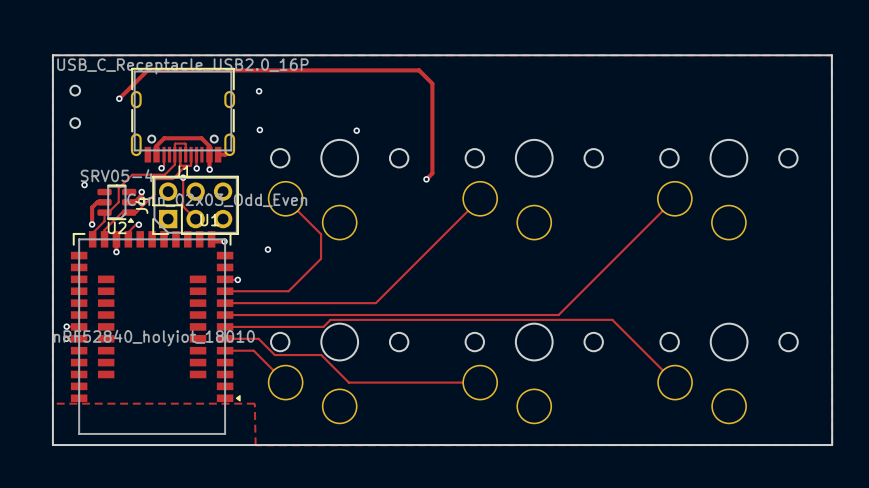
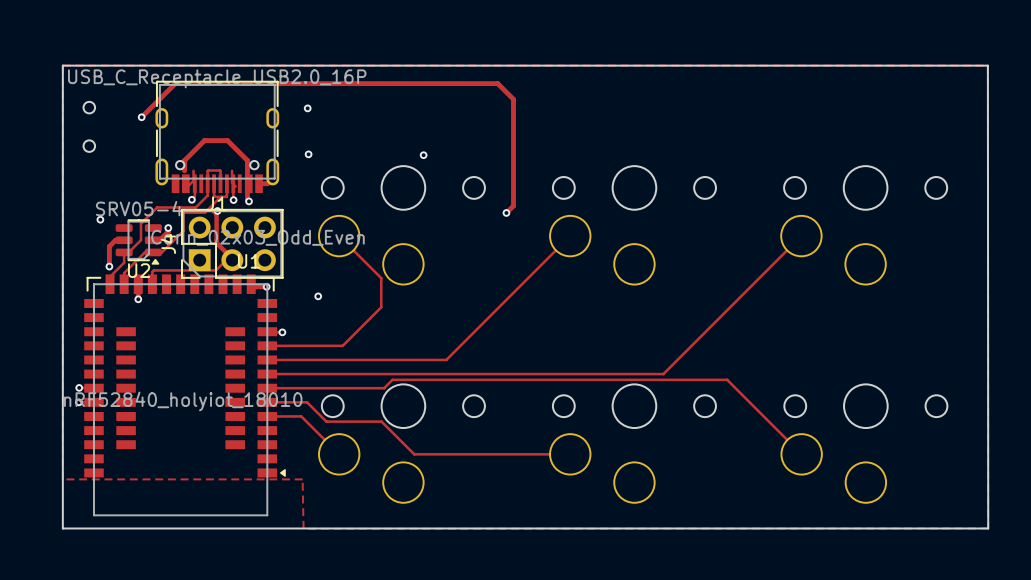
track: none -> (193, 170) (193, 180) (187, 186)
track: none -> (232, 170) (232, 182) (235, 186)
track: (156, 154) (156, 146) (164, 138) (201, 138) (209, 146) (209, 169) -> (184, 170) (184, 160) (204, 140) (227, 140) (247, 160) (248, 201)
track: (138, 224) (135, 224) (128, 232) -> (211, 210) (215, 214) (215, 240) (230, 255) (215, 270) (153, 270) (152, 275)
via: (138, 224) -> none

